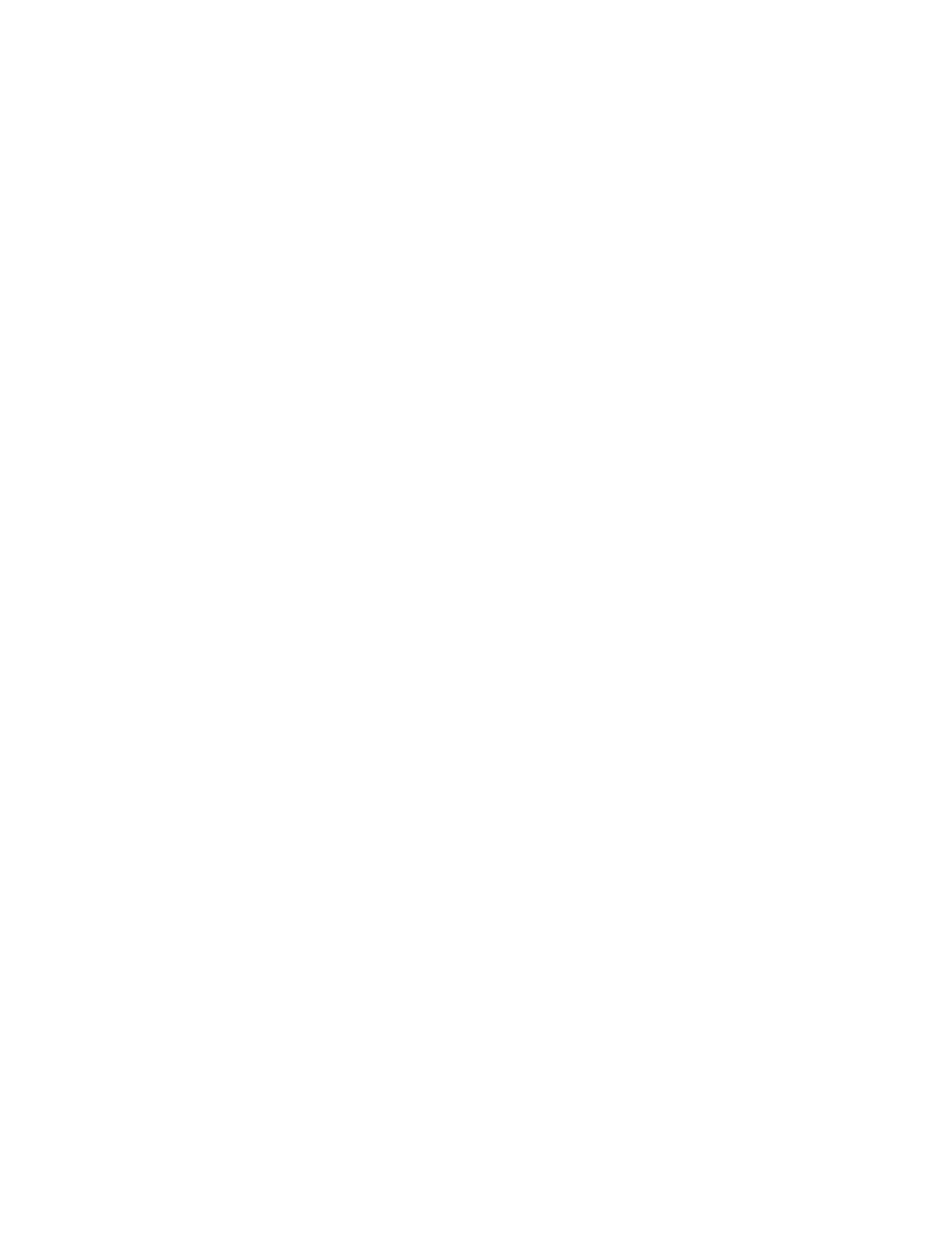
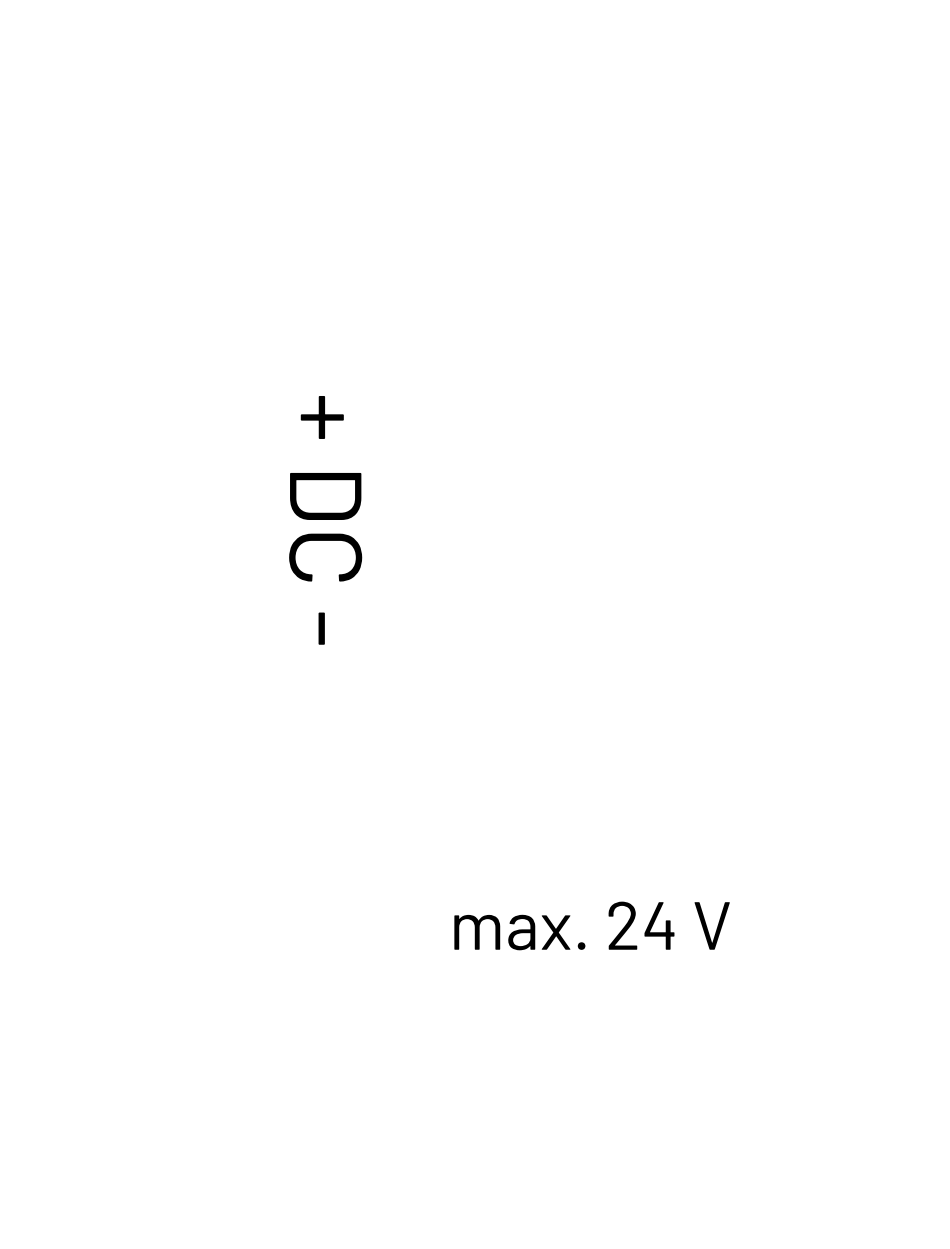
text: none -> + DC - (325, 520)
text: none -> max. 24 V (592, 925)

